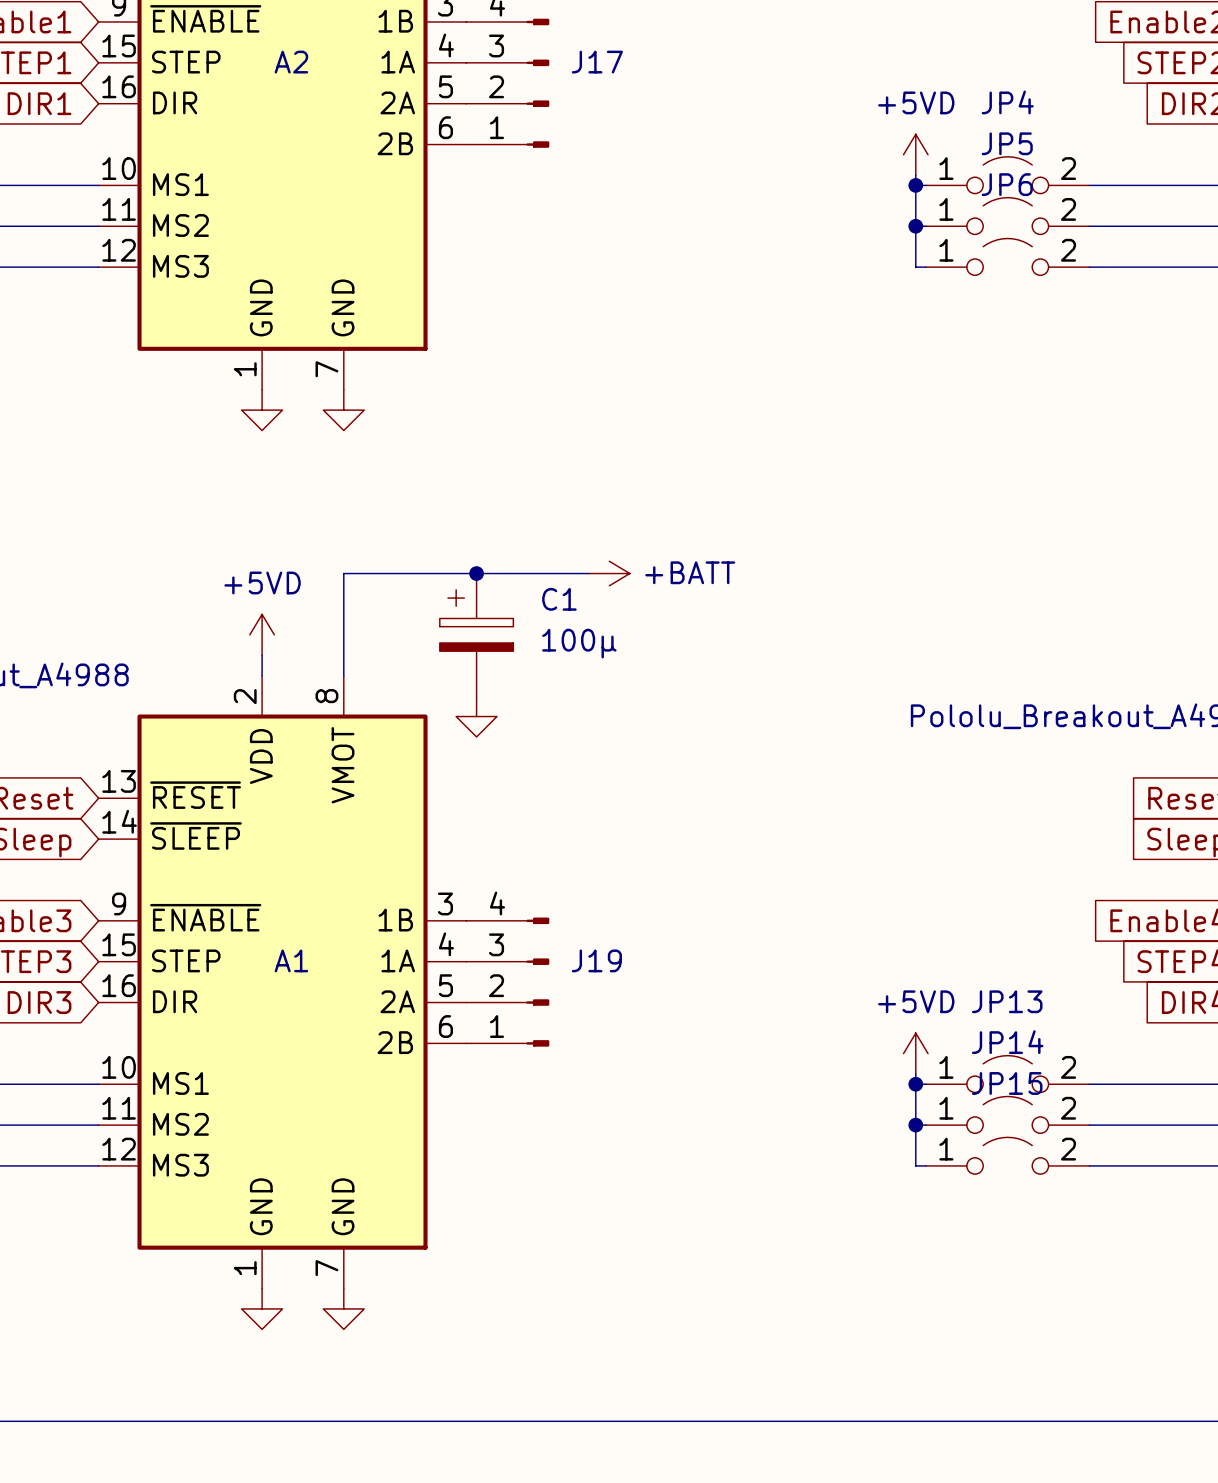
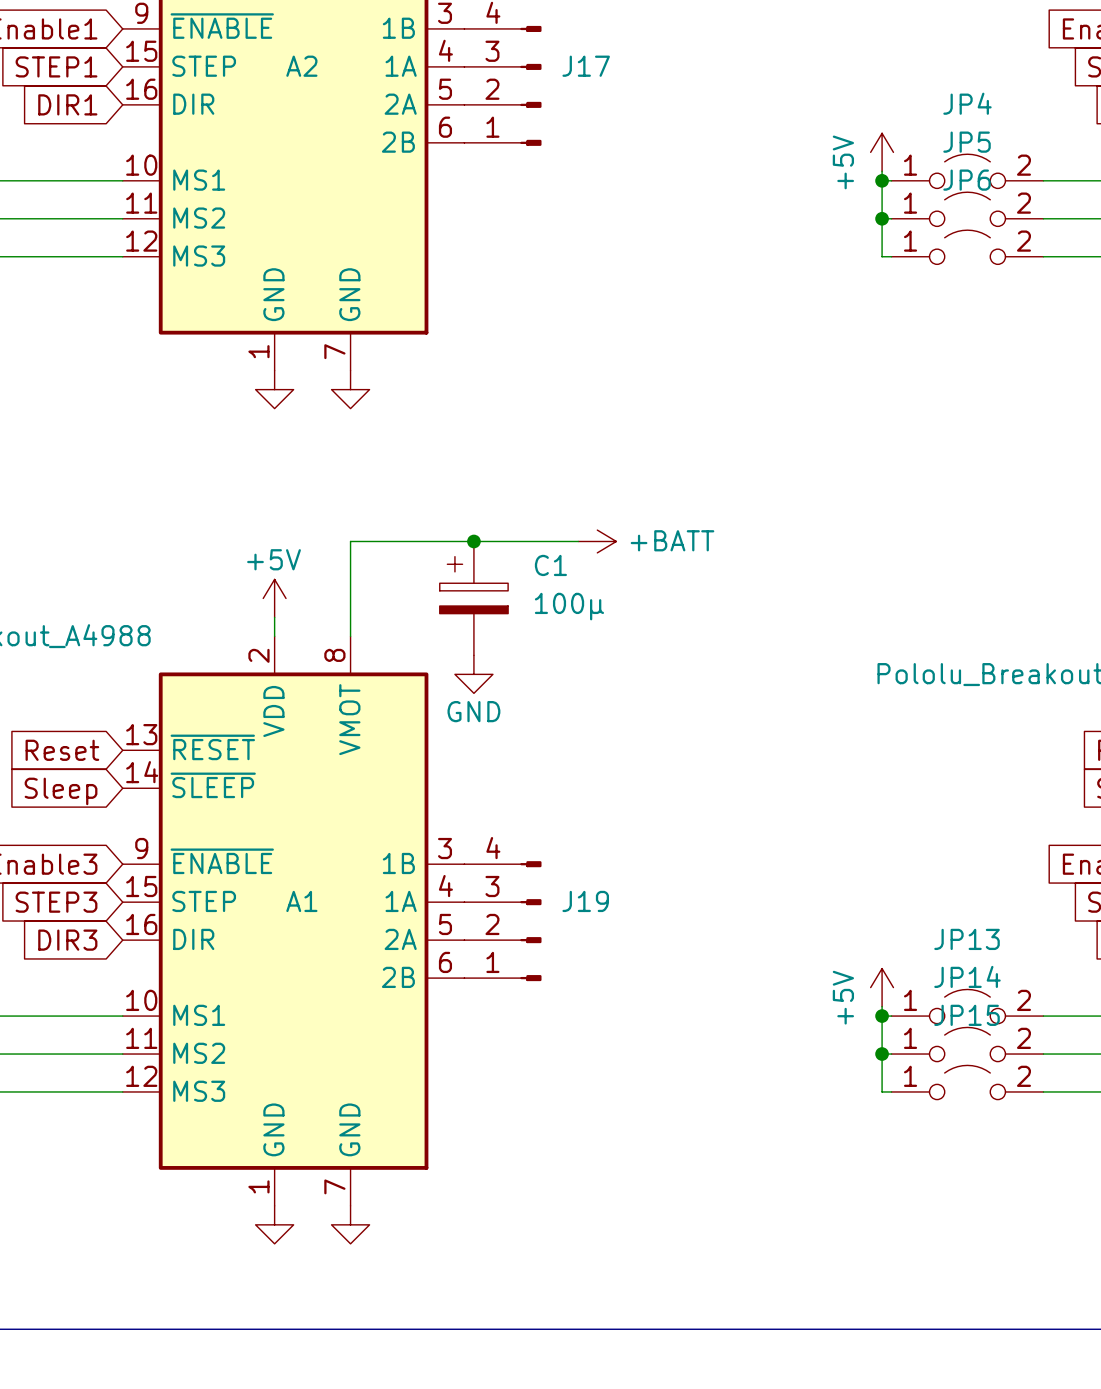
power symbol: +5VD (915, 154) -> +5V (882, 152)
power symbol: +5VD (262, 634) -> +5V (274, 598)
power symbol text: none -> GND (473, 711)
power symbol: +5VD (915, 1053) -> +5V (882, 987)

